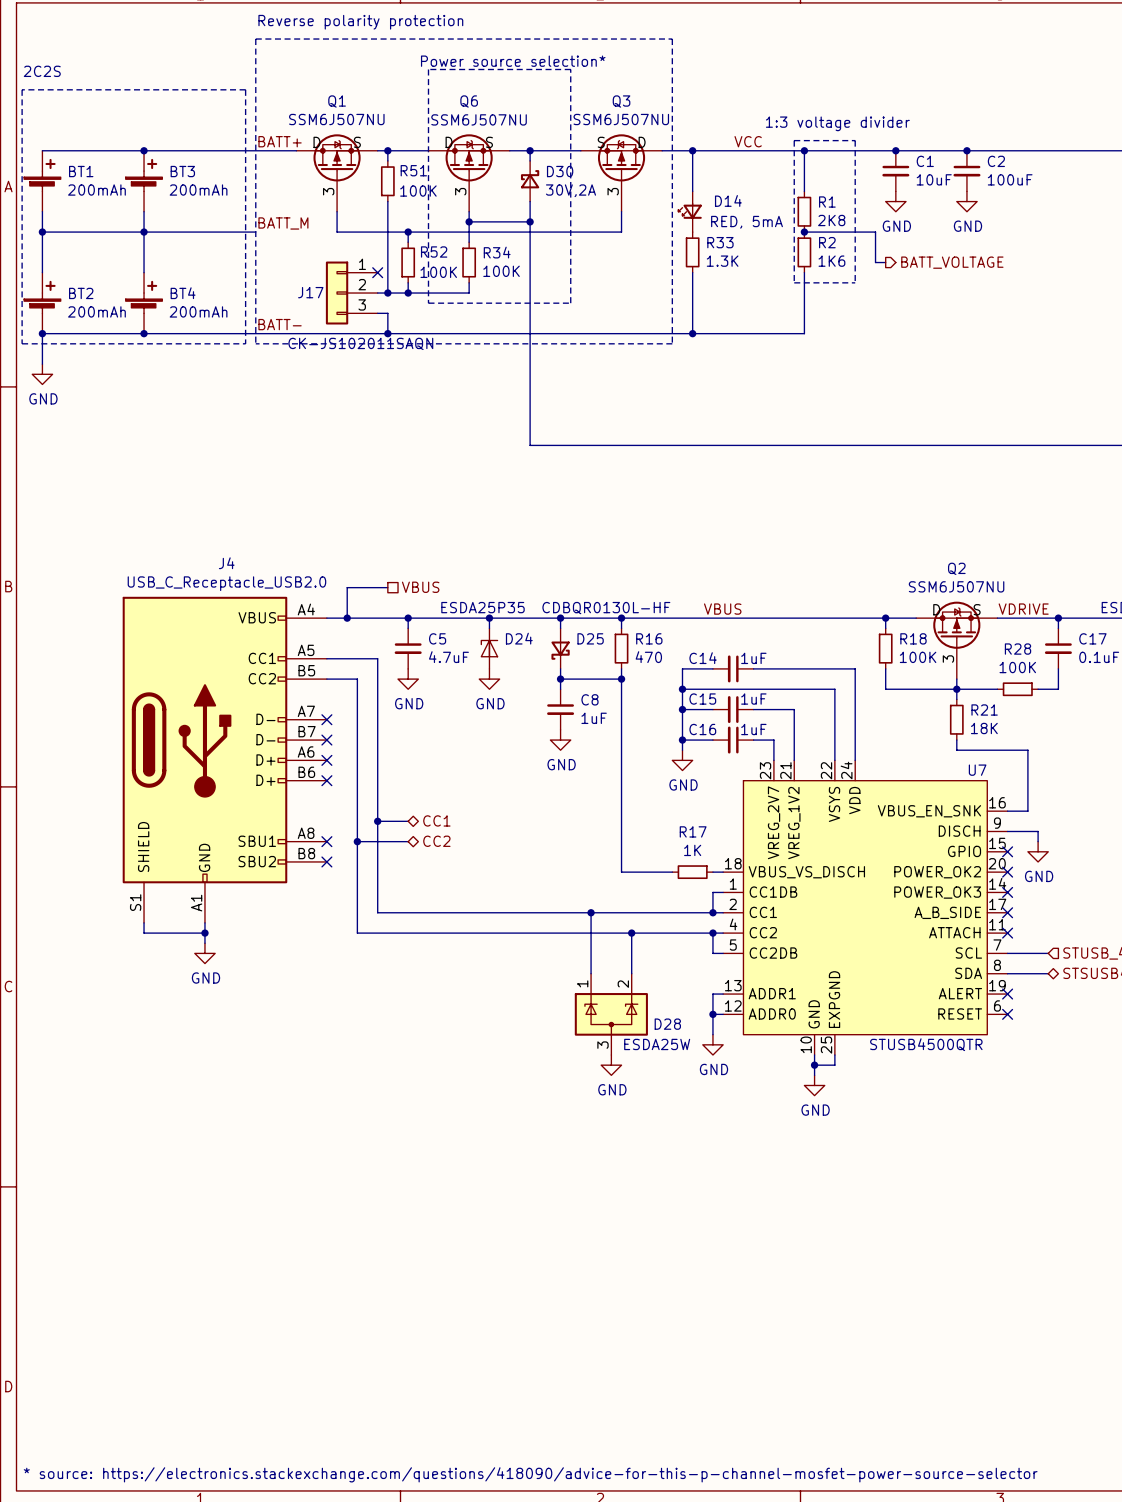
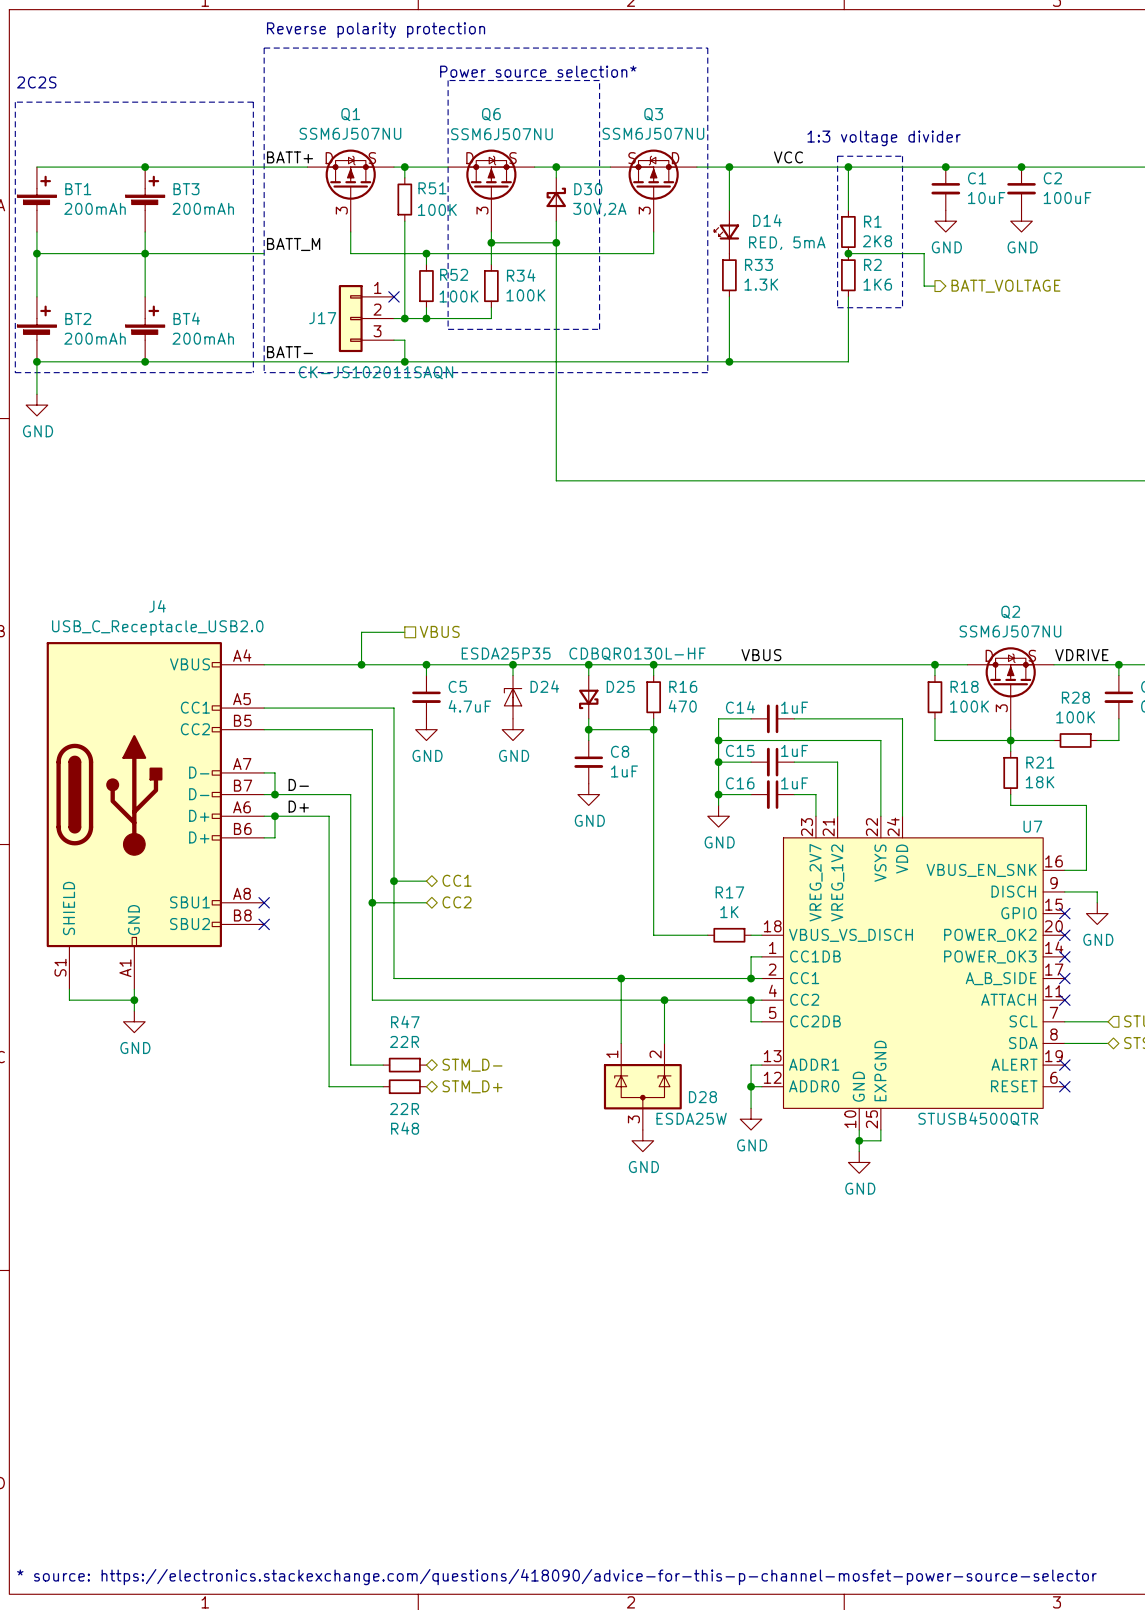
no-connect mark: (326, 719) -> none
label: none -> D- (298, 784)
wire: none -> (264, 794) (350, 794) (350, 1065) (383, 1065)
junction: none -> (274, 794)
no-connect mark: (326, 740) -> none
label: none -> D+ (298, 806)
J4 position: (224, 759) -> (155, 815)
wire: none -> (264, 816) (329, 816) (329, 1086) (383, 1086)
junction: none -> (274, 816)
no-connect mark: (326, 760) -> none
no-connect mark: (326, 780) -> none
no-connect mark: none -> (264, 902)
no-connect mark: (326, 841) -> none
no-connect mark: none -> (264, 924)
no-connect mark: (326, 861) -> none
wire: (144, 922) (144, 933) (204, 933) -> (69, 989) (69, 1000) (134, 1000)
wire: (204, 922) (204, 943) -> (134, 989) (134, 1010)
junction: none -> (134, 1000)
junction: (204, 933) -> none
power symbol position: GND (204, 953) -> GND (134, 1021)
R47: none -> 22R (404, 1065)
hierarchical label: none -> STM_D- (472, 1065)
R48: none -> 22R (404, 1086)
hierarchical label: none -> STM_D+ (472, 1086)

